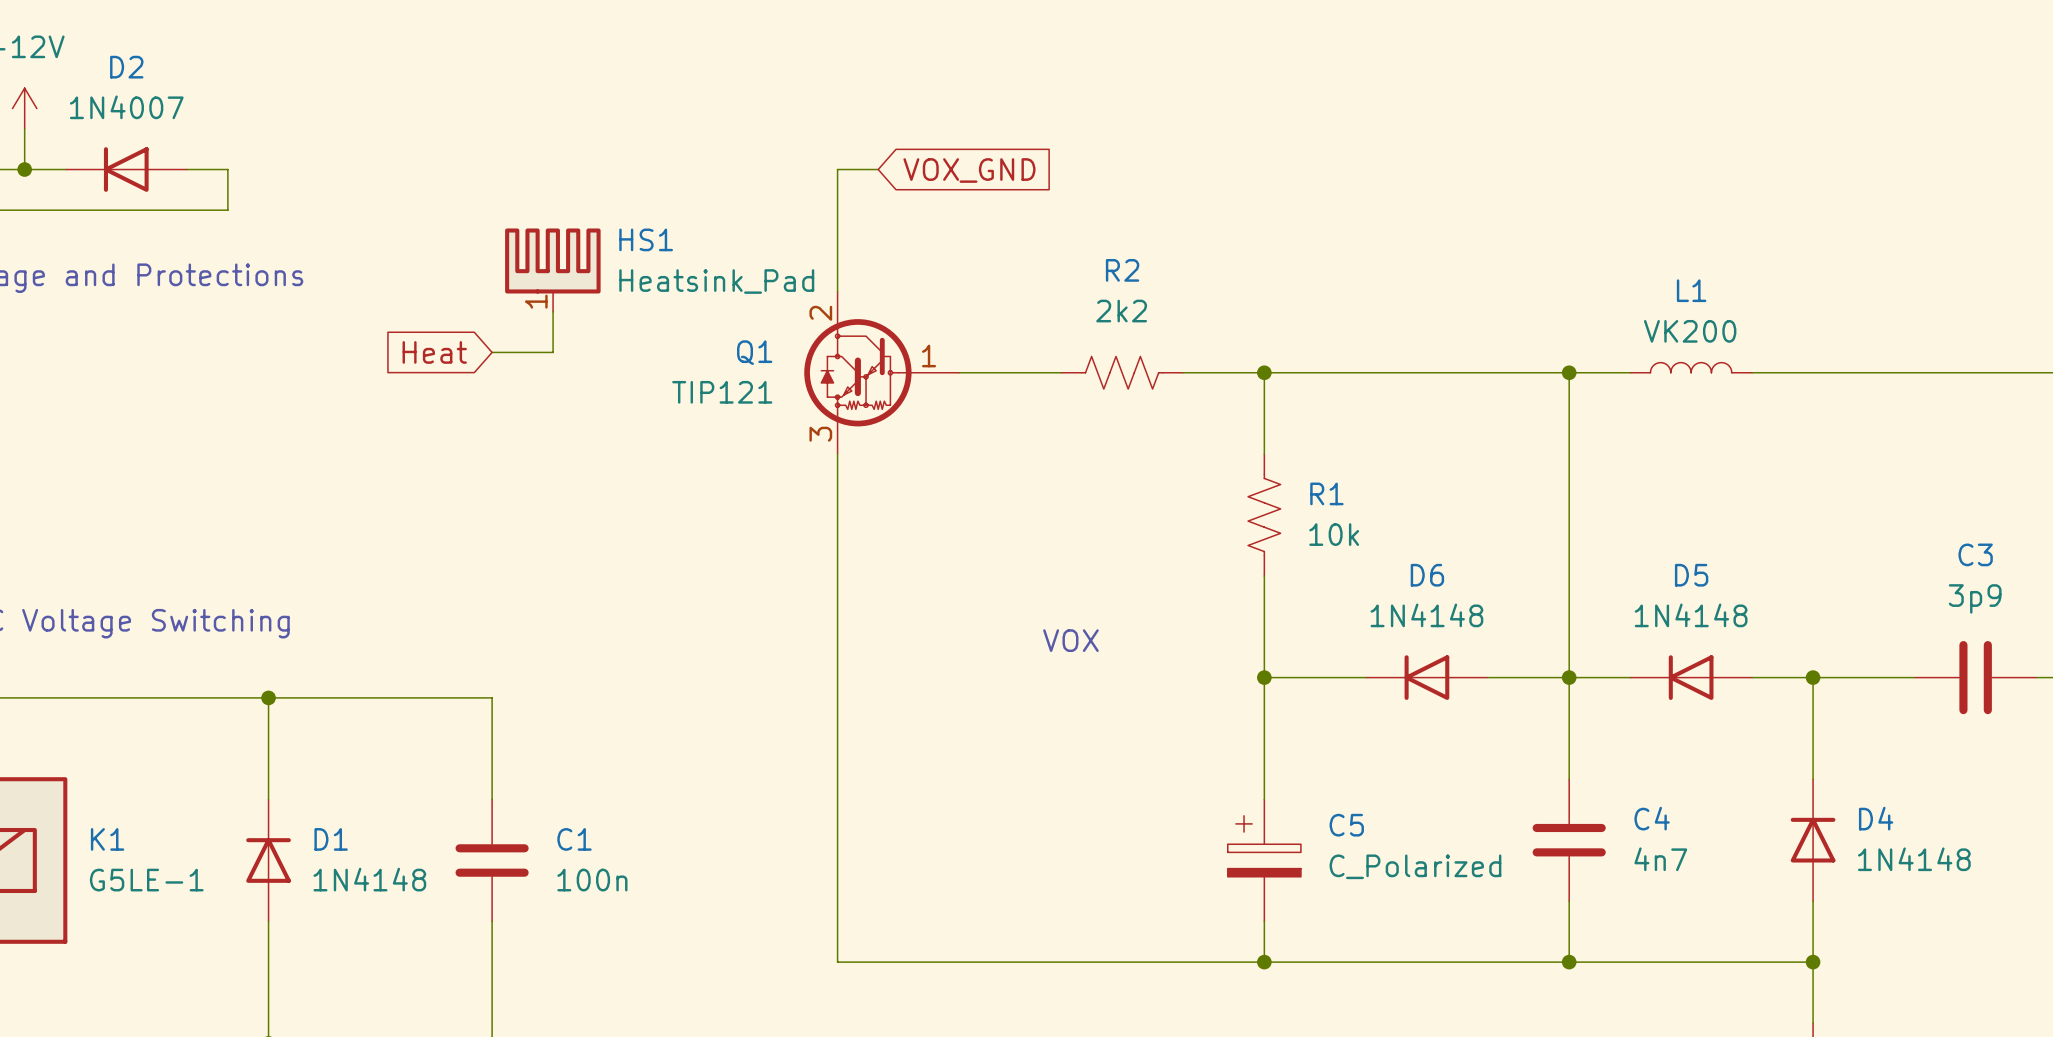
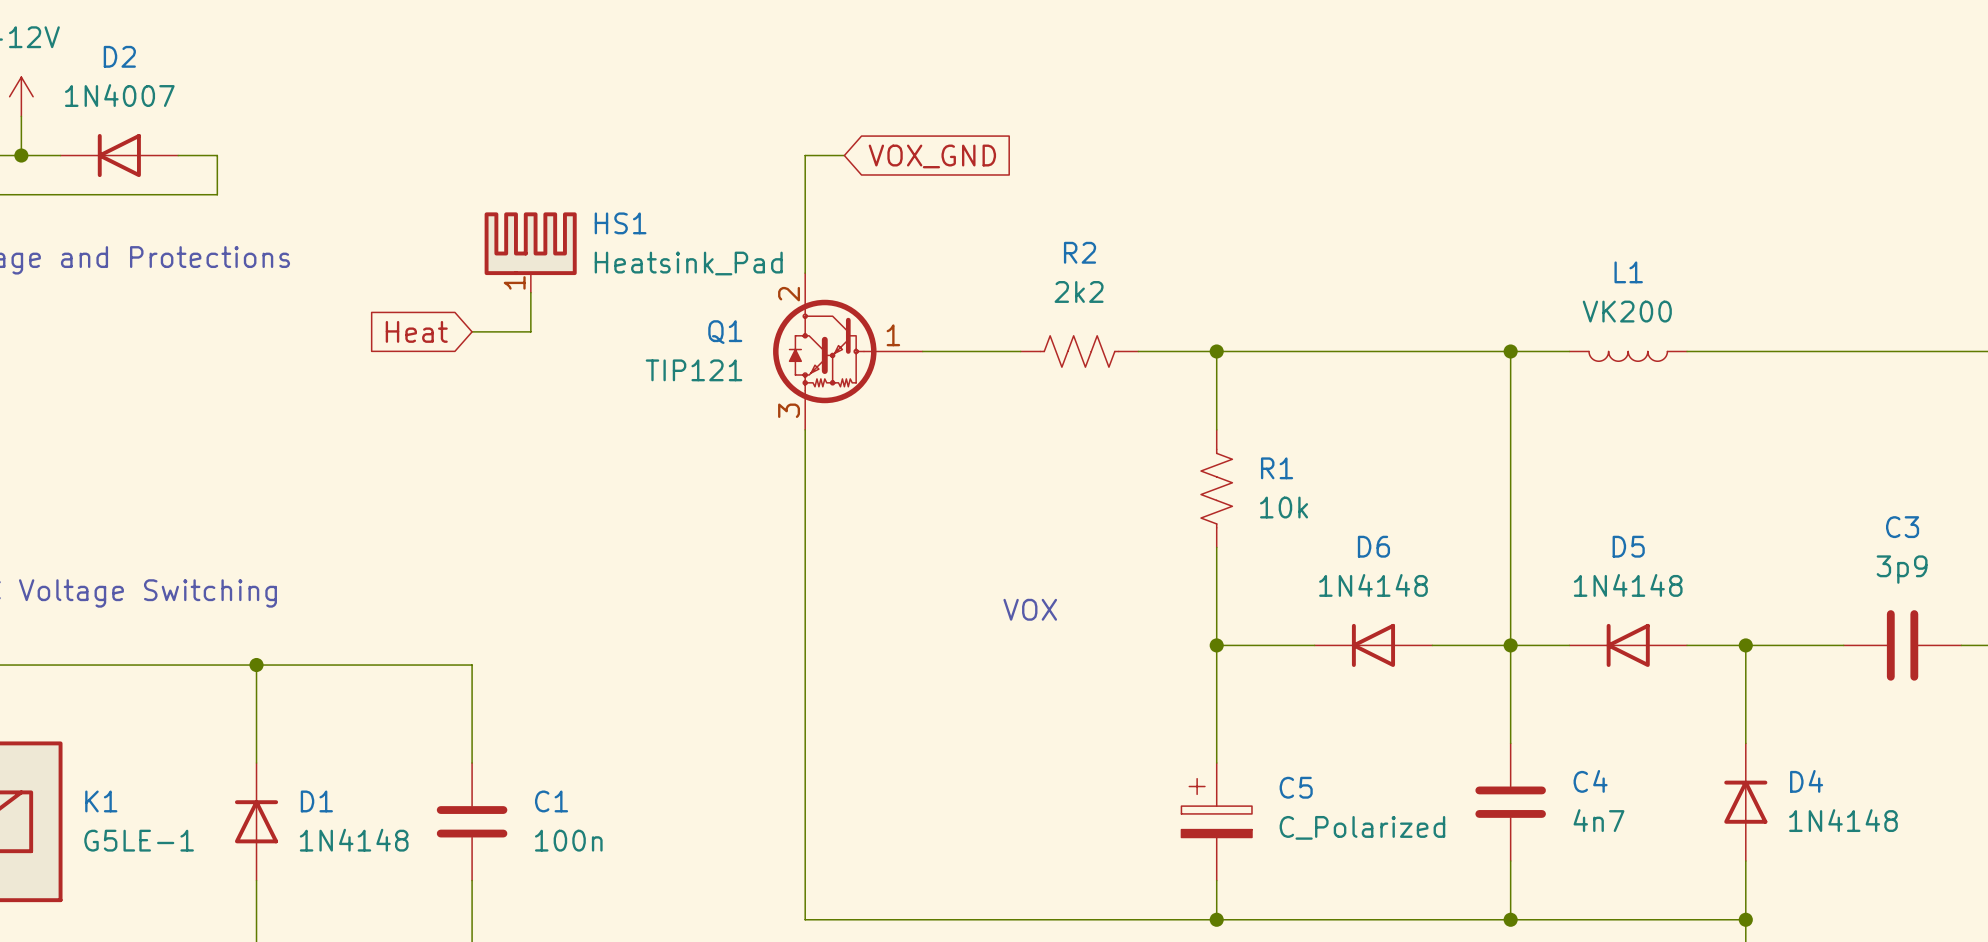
L1 rotation: 0° (1691, 367) -> 180° (1628, 356)

